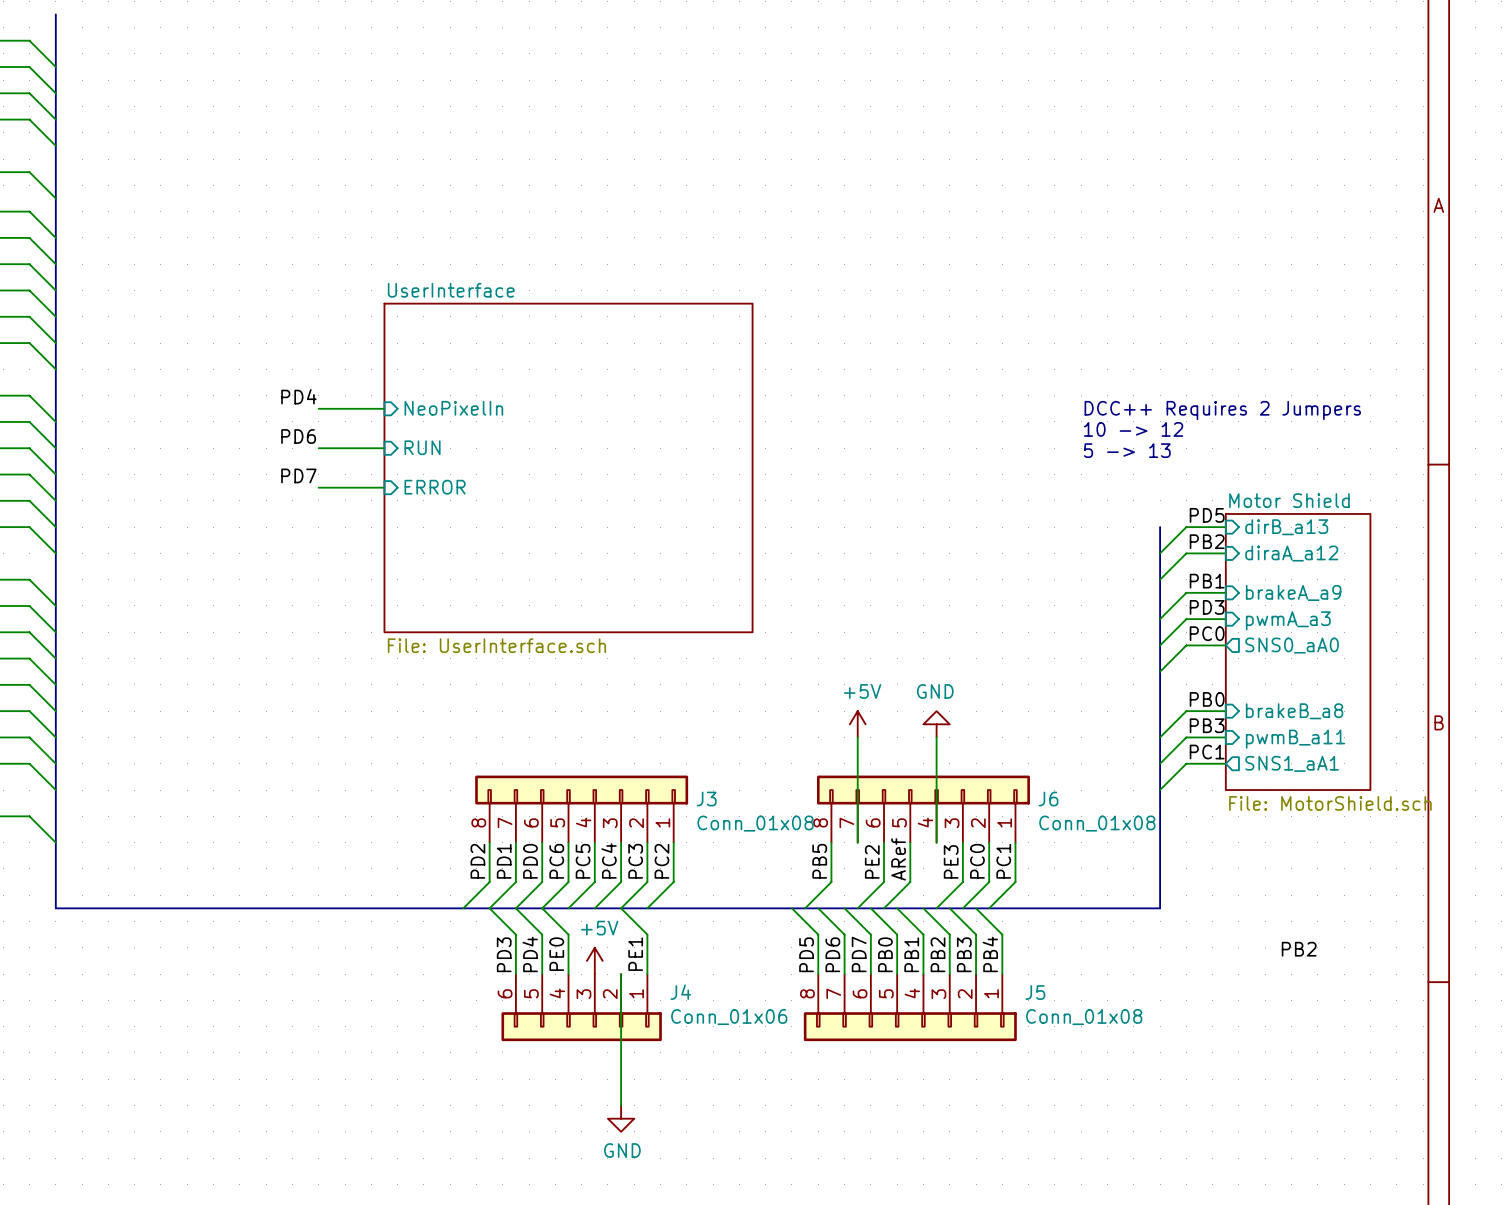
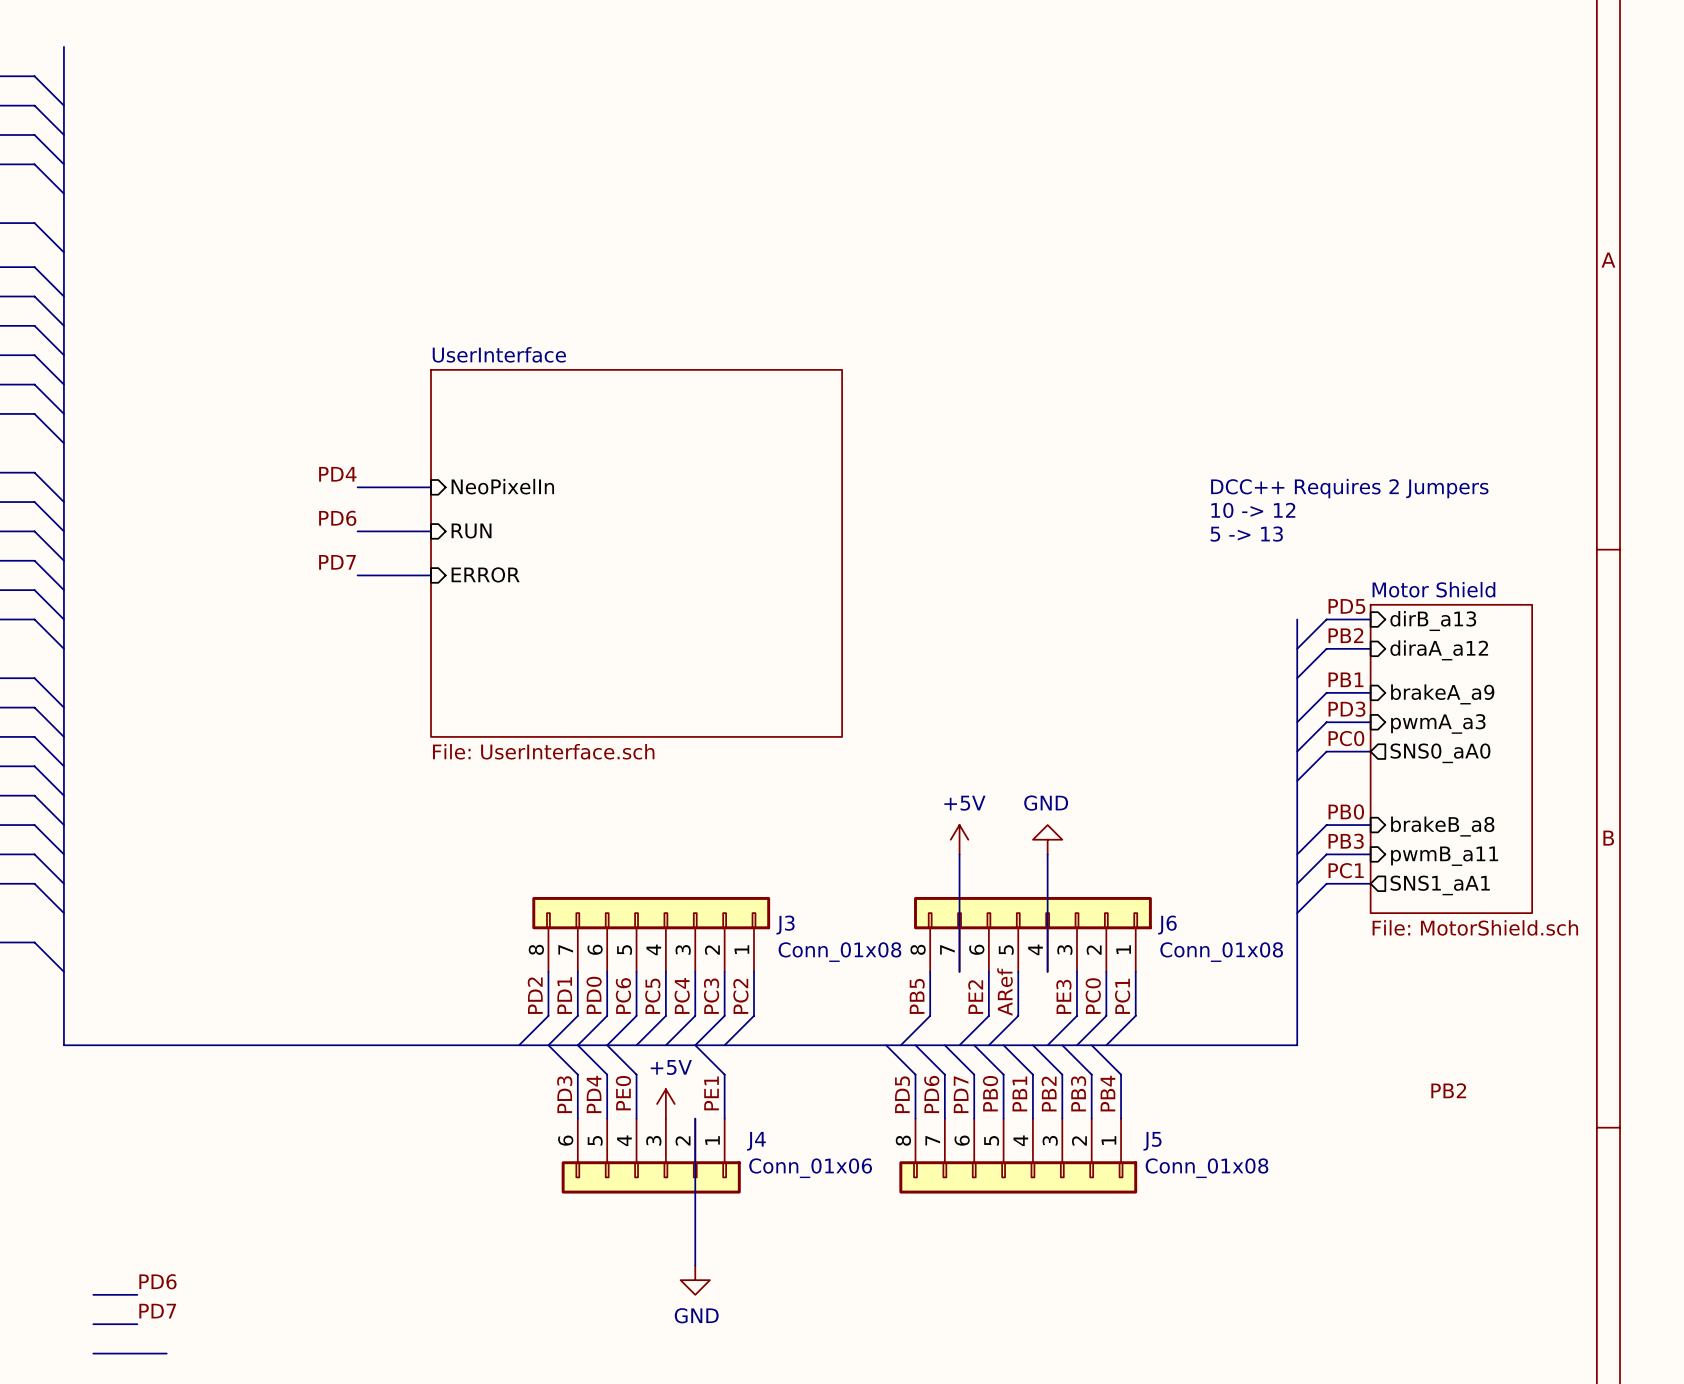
label: none -> PD6 (157, 1281)
wire: none -> (93, 1294) (137, 1294)
label: none -> PD7 (157, 1311)
wire: none -> (93, 1324) (137, 1324)
wire: none -> (93, 1353) (166, 1353)

